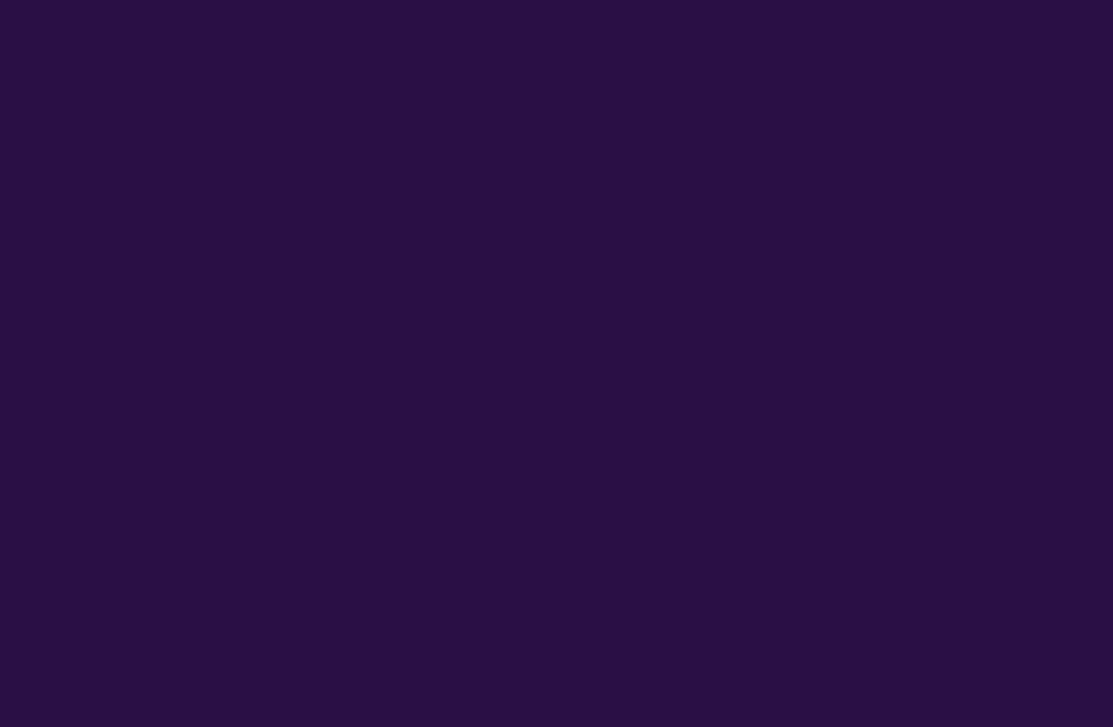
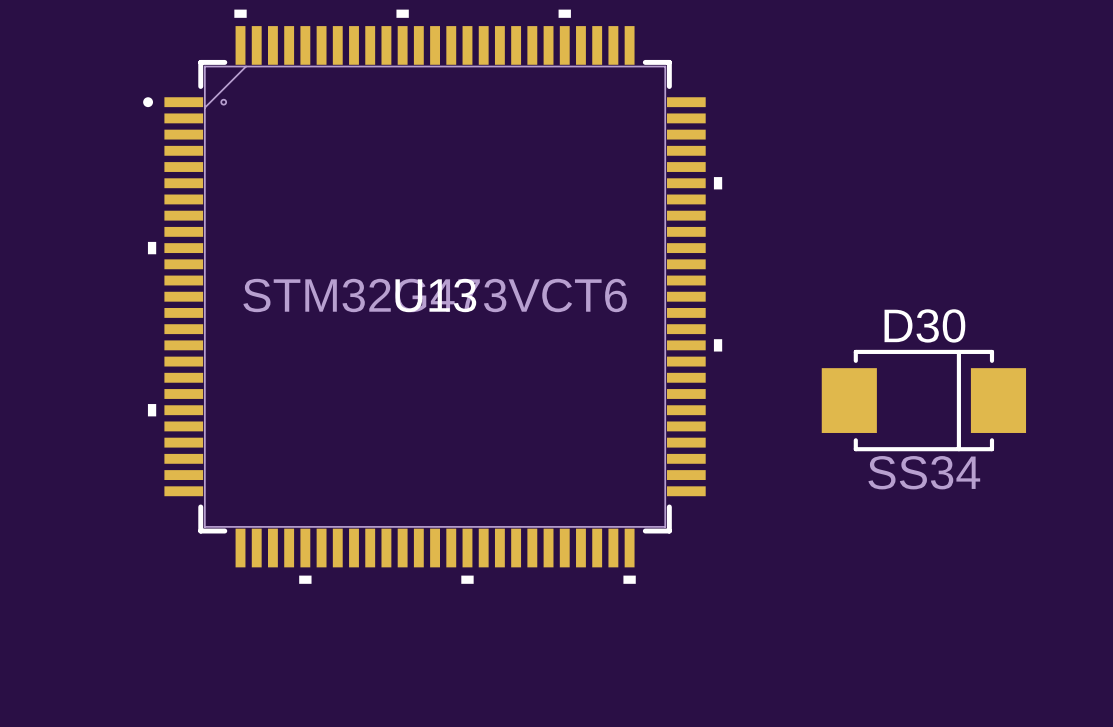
U13: none -> STM32G473VCT6 (432, 296)
D30: none -> SS34 (923, 400)

